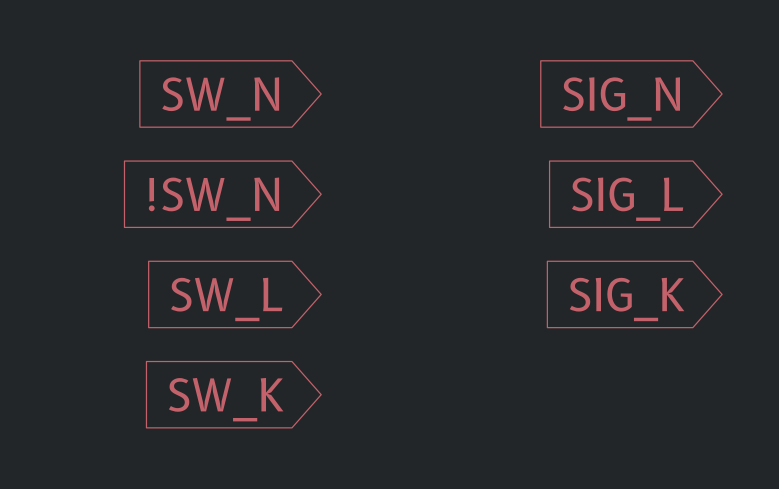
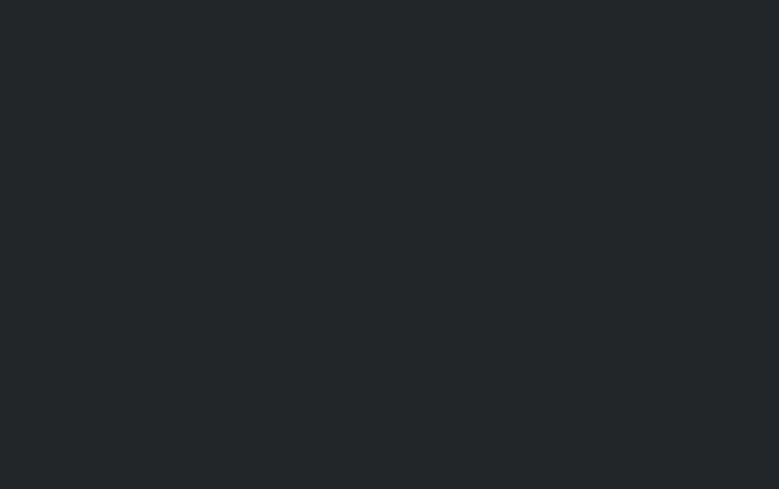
global label: SW_N (220, 99) -> none
global label: SIG_N (621, 99) -> none
global label: !SW_N (213, 199) -> none
global label: SIG_L (627, 199) -> none
global label: SW_L (226, 299) -> none
global label: SIG_K (627, 299) -> none
global label: SW_K (226, 399) -> none

